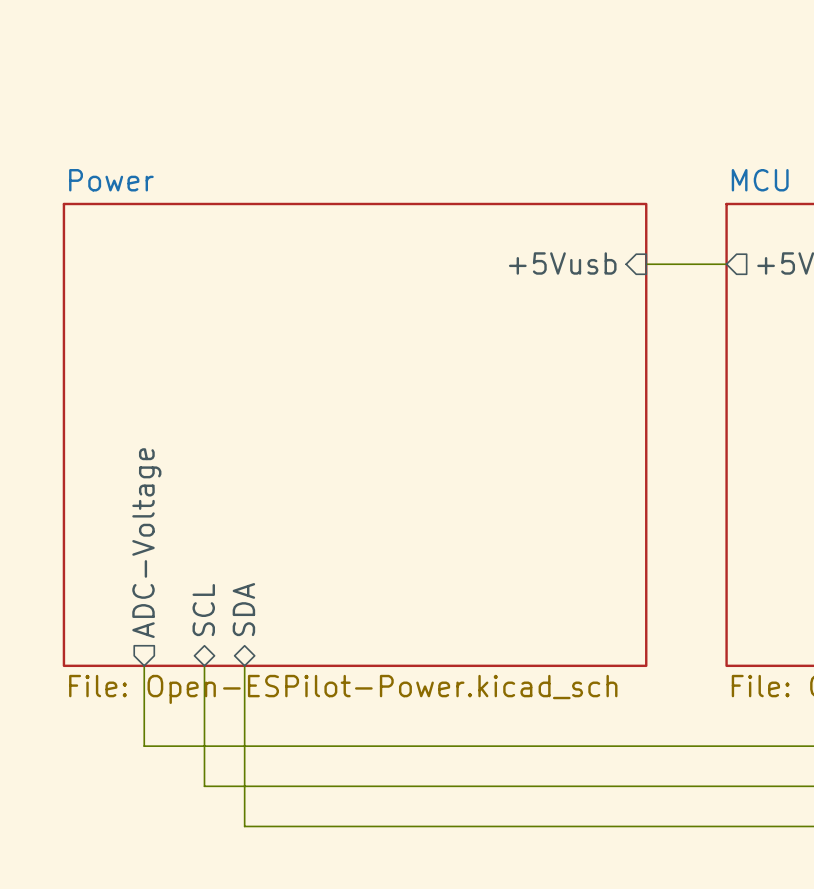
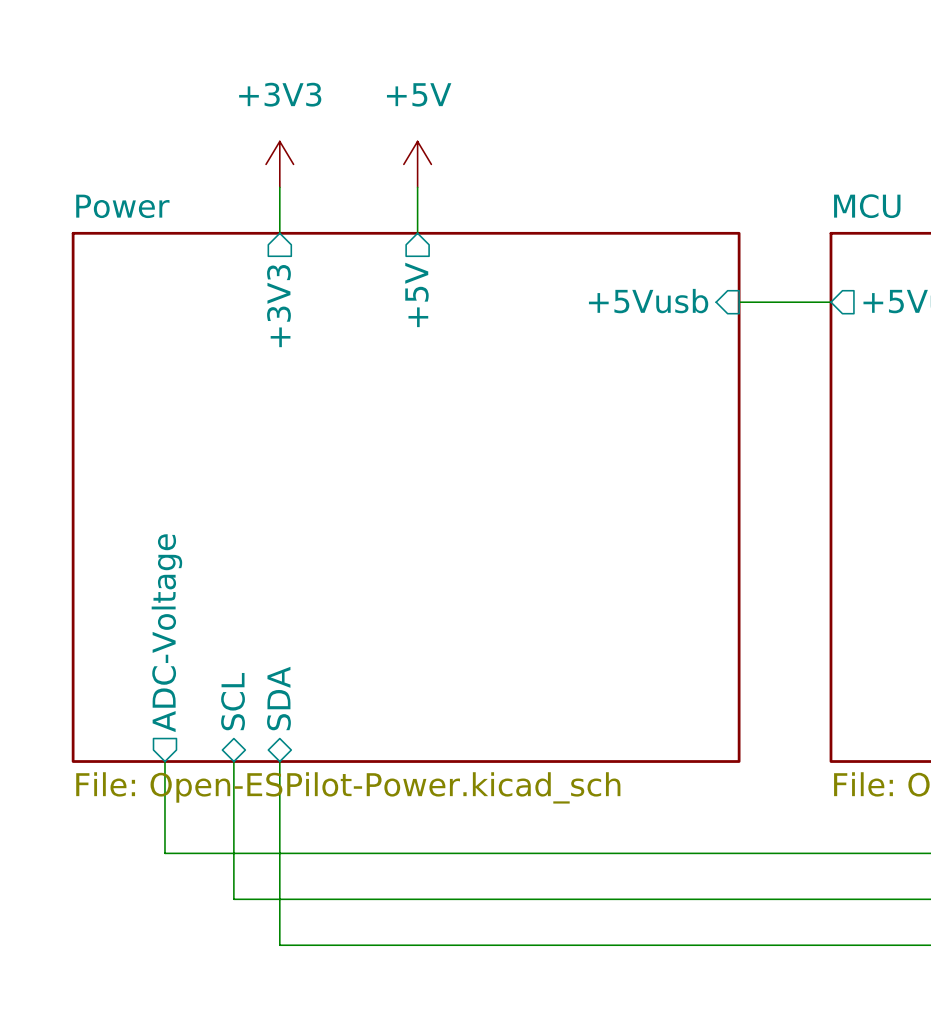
power symbol: none -> +3V3 (279, 164)
power symbol: none -> +5V (417, 164)
wire: none -> (279, 187) (279, 233)
wire: none -> (417, 187) (417, 233)
sheet pin: none -> +5V (416, 294)
sheet pin: none -> +3V3 (278, 306)

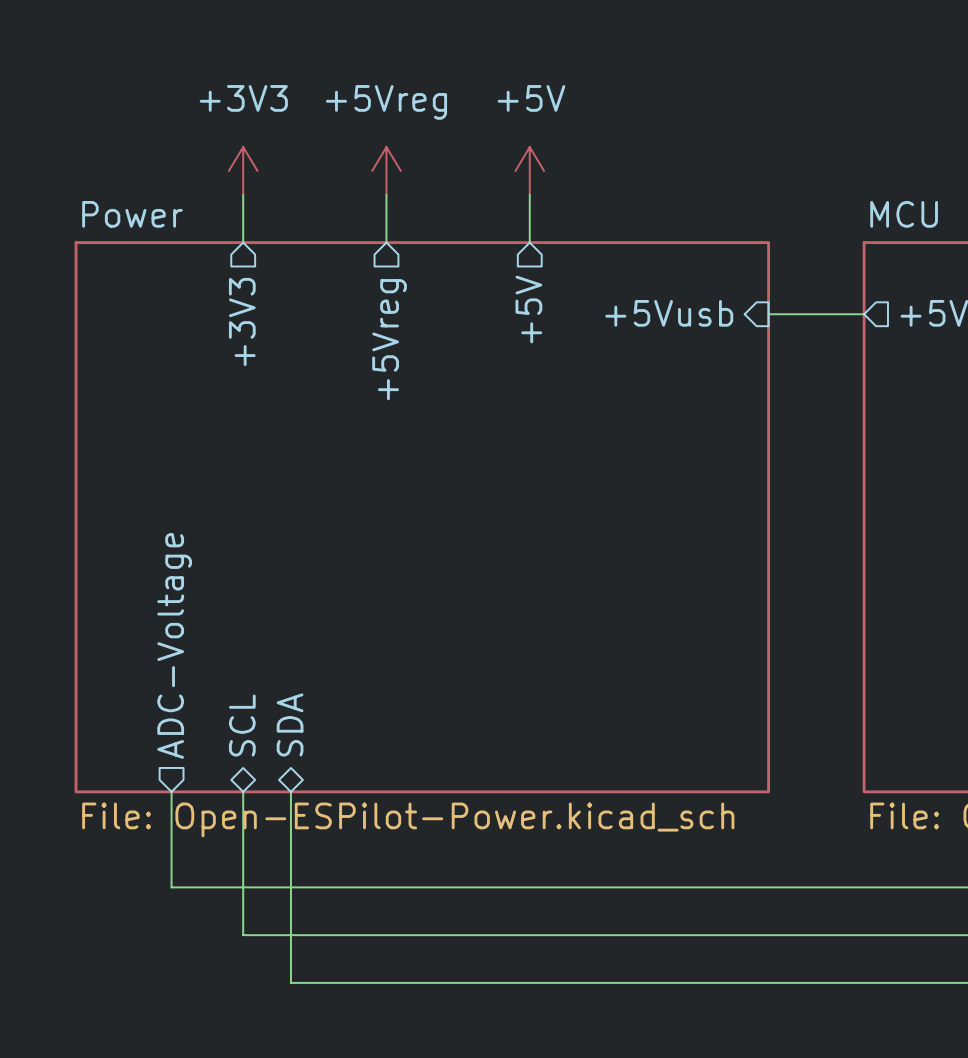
power symbol position: +3V3 (279, 164) -> +3V3 (243, 170)
power symbol: none -> +5Vreg (386, 170)
power symbol position: +5V (417, 164) -> +5V (529, 170)
wire: (279, 187) (279, 233) -> (243, 194) (243, 242)
wire: (417, 187) (417, 233) -> (386, 194) (386, 242)
wire: none -> (529, 194) (529, 242)
sheet pin position: +5V (416, 294) -> +5V (528, 309)
sheet pin position: +3V3 (278, 306) -> +3V3 (242, 322)
sheet pin: none -> +5Vreg (389, 339)

